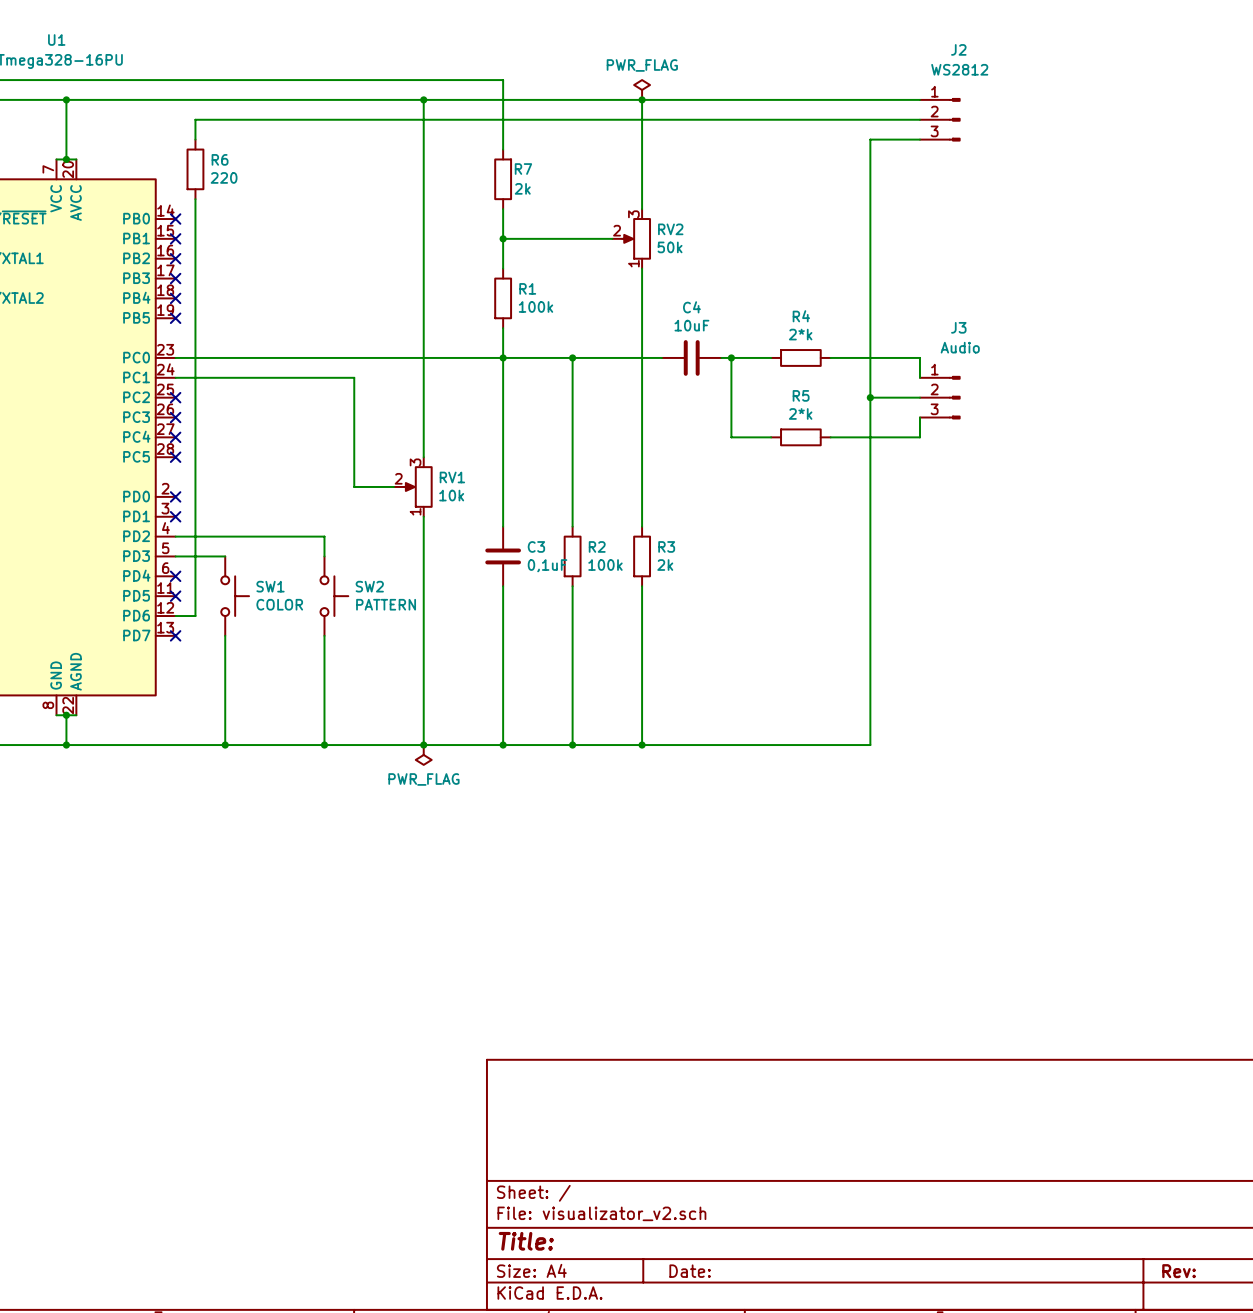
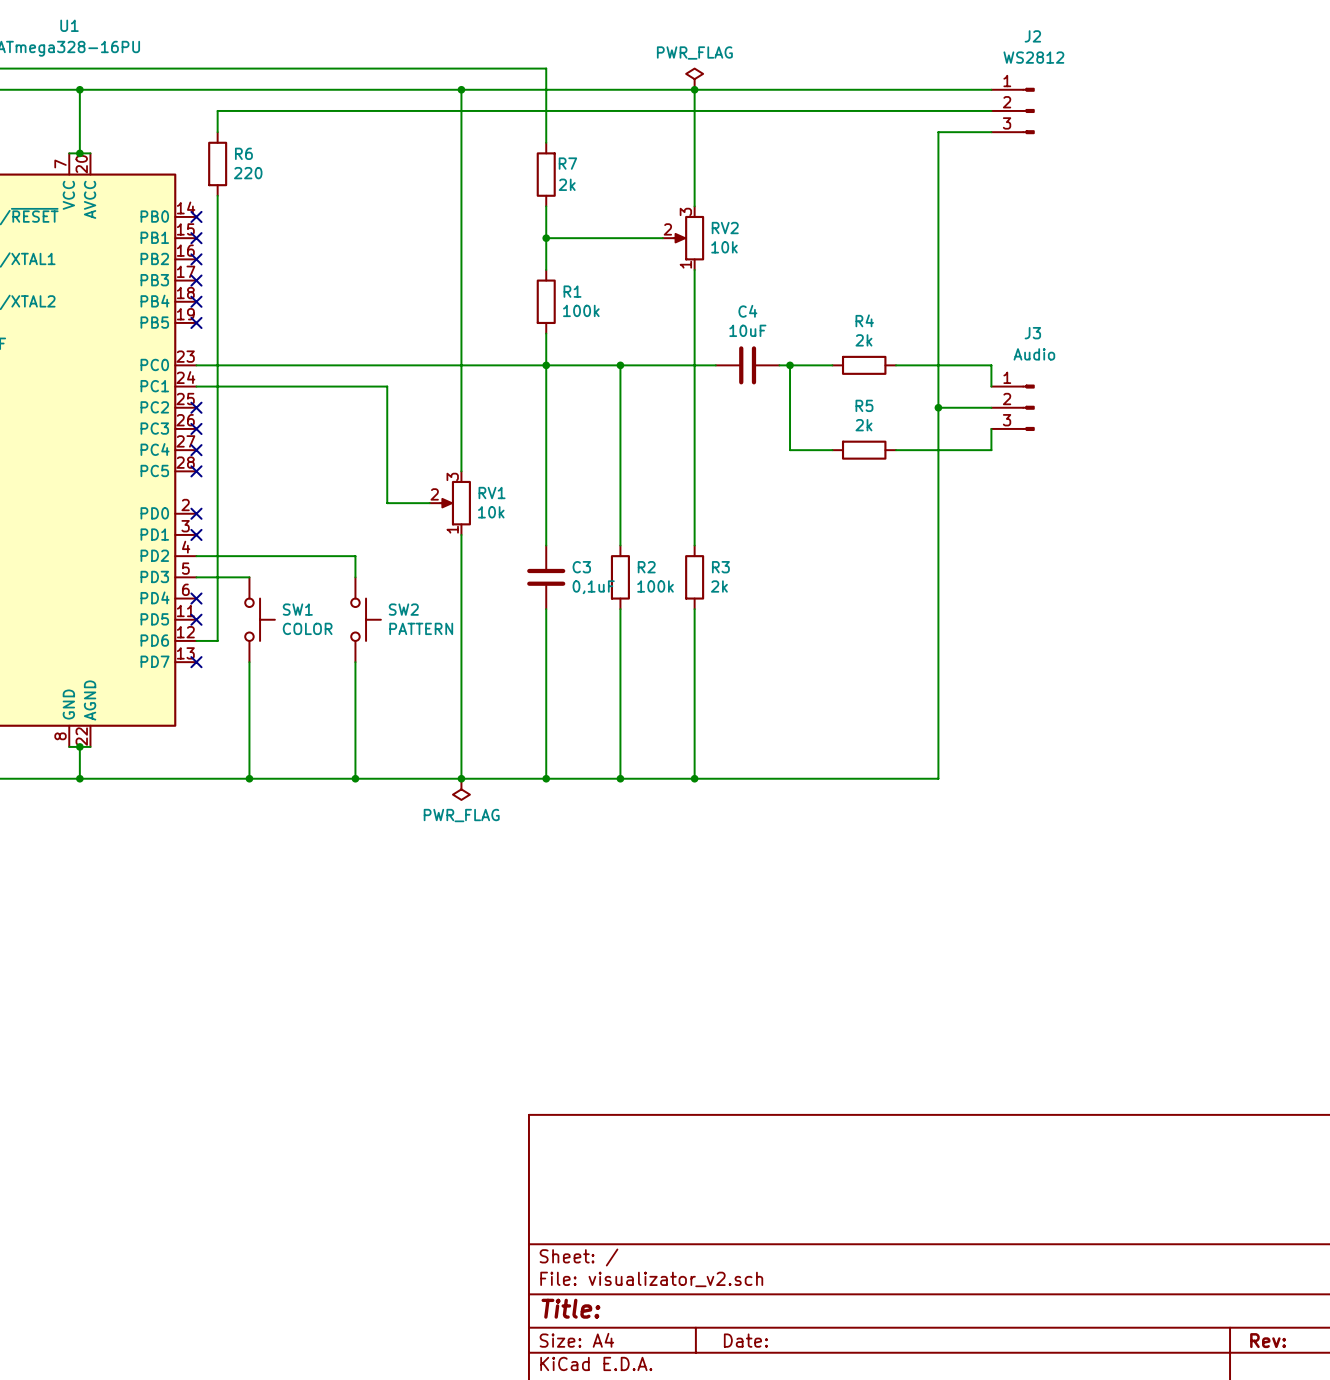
RV2 value: 50k (670, 247) -> 10k (724, 247)
R4 value: 2*k (800, 334) -> 2k (863, 340)
R5 value: 2*k (800, 413) -> 2k (863, 425)

